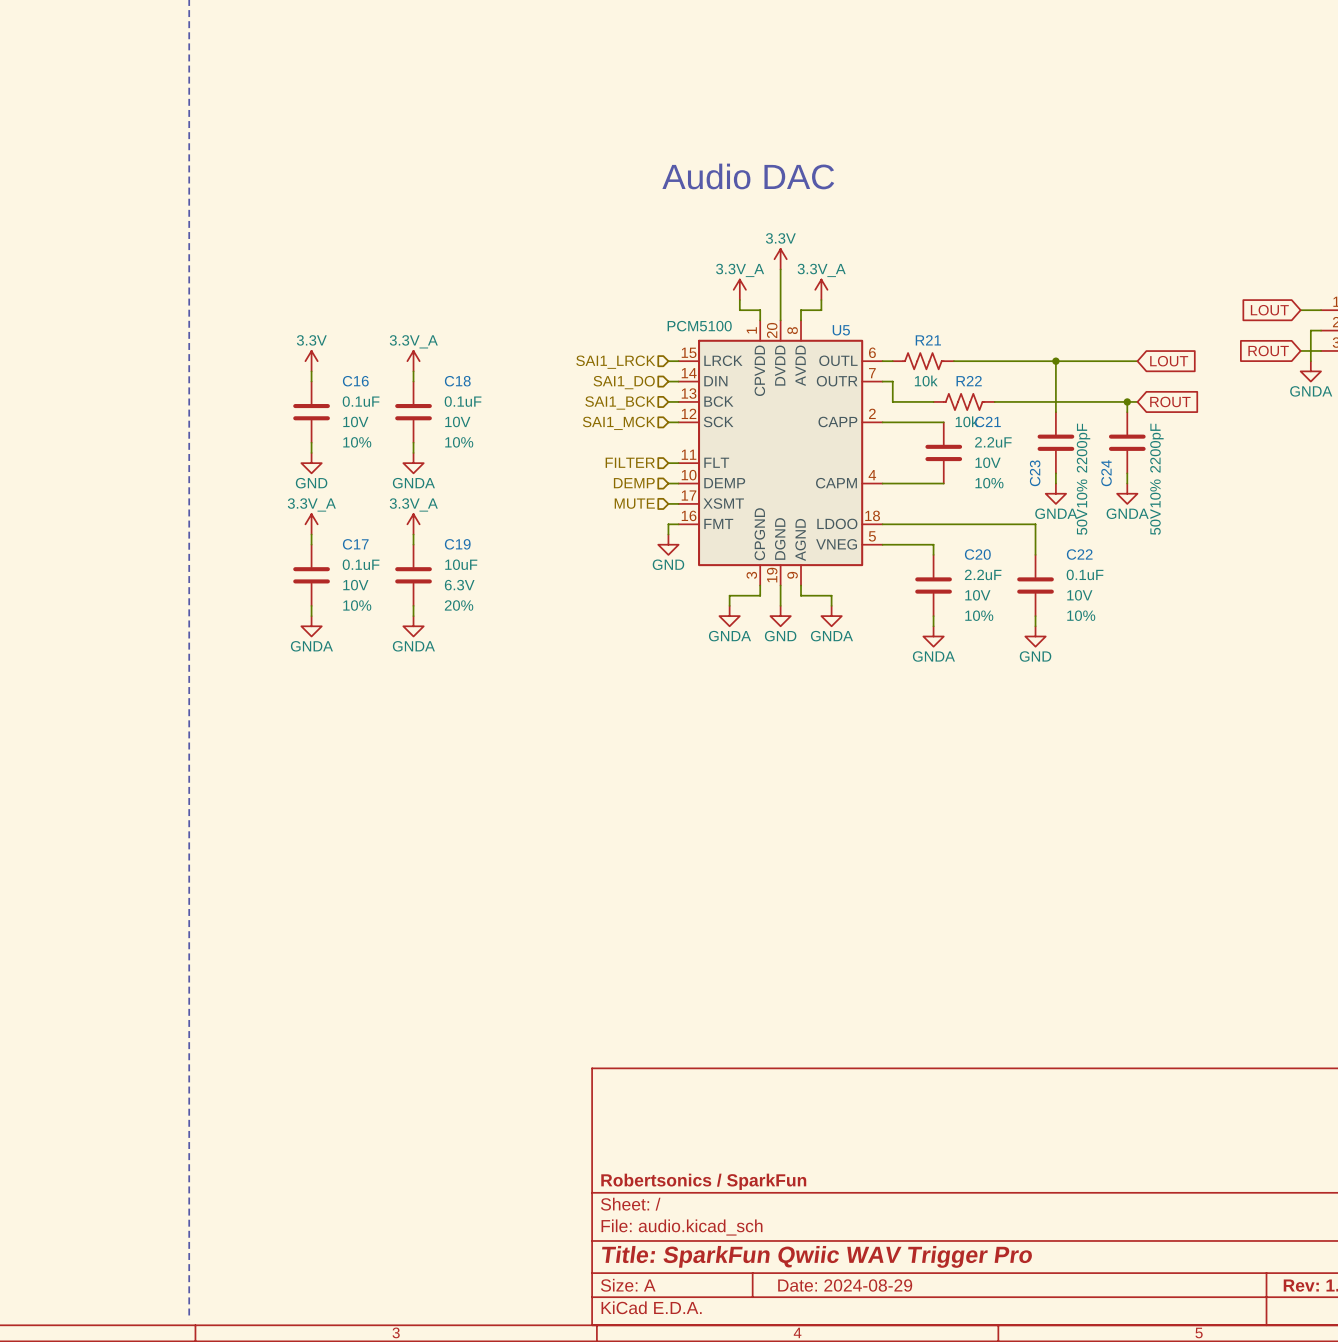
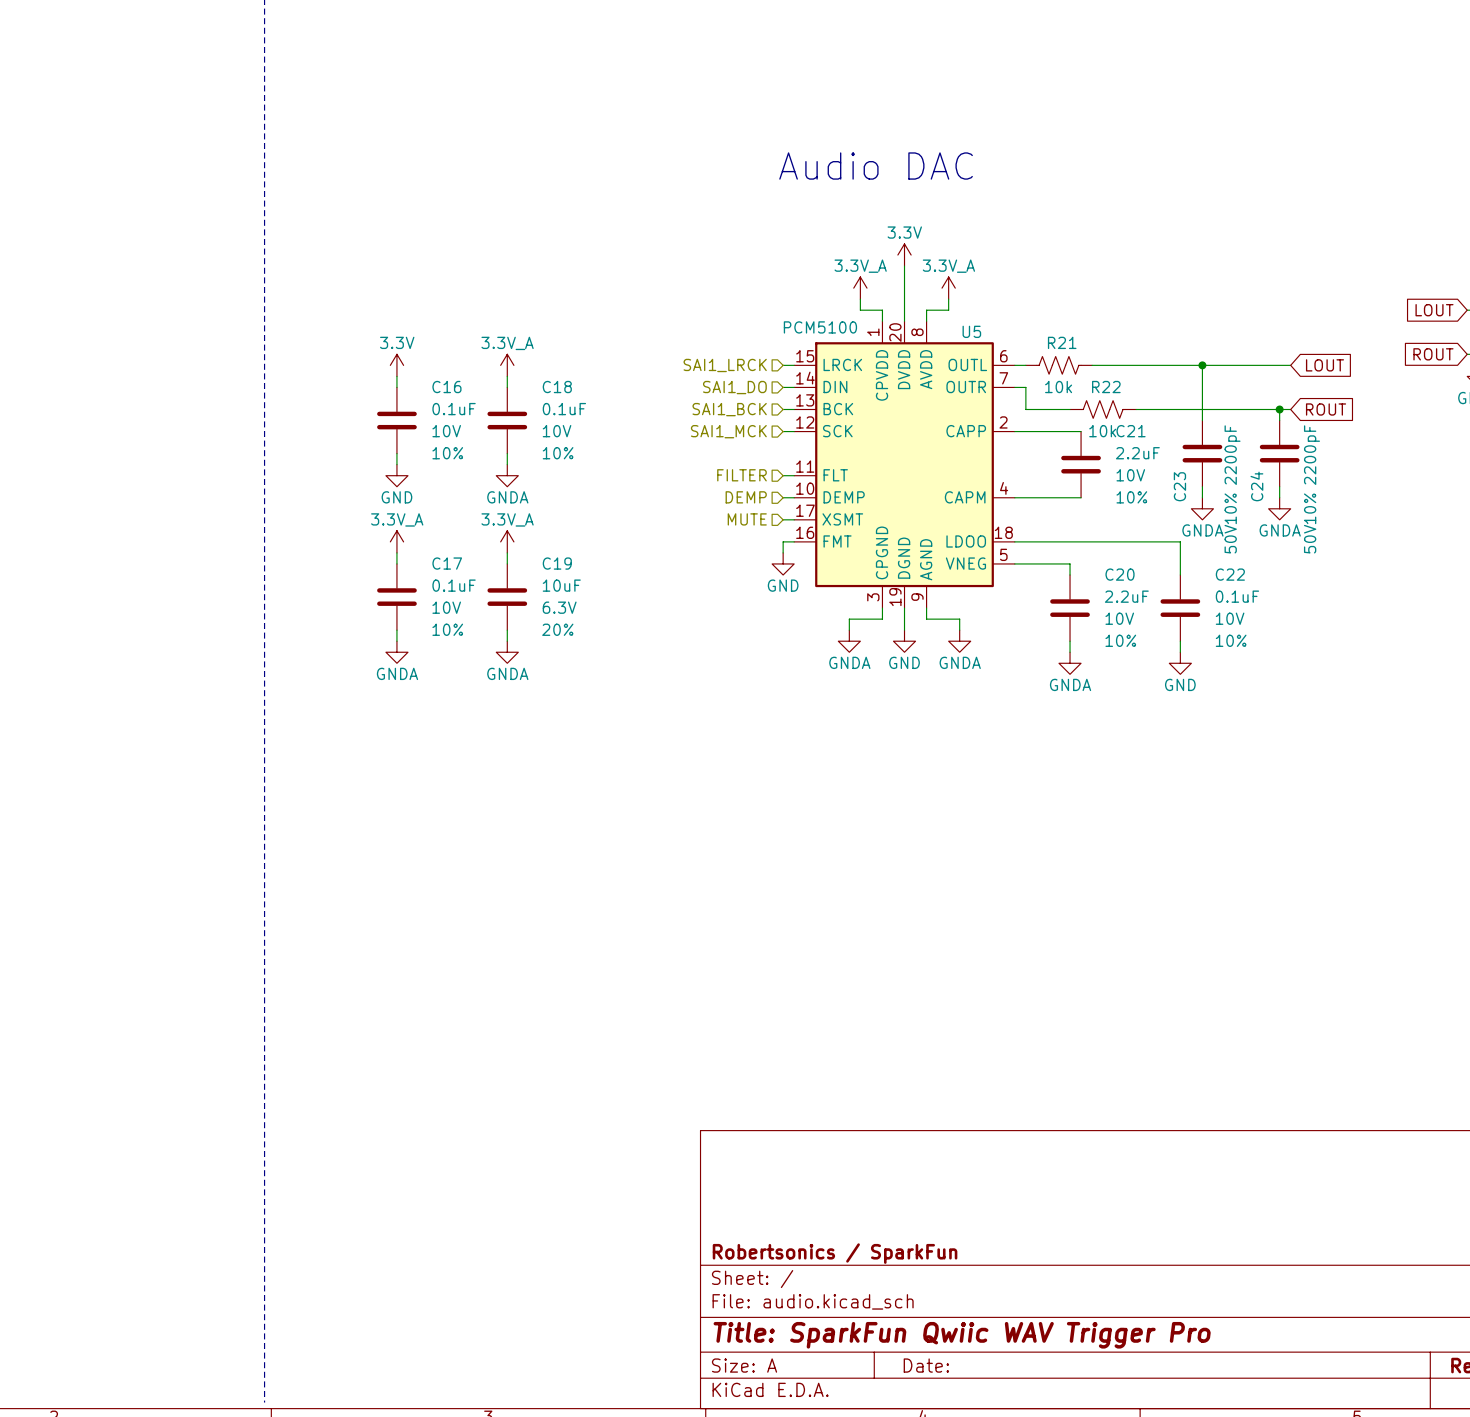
title block: Date: 2024-08-29 (845, 1285) -> Date: (926, 1365)

